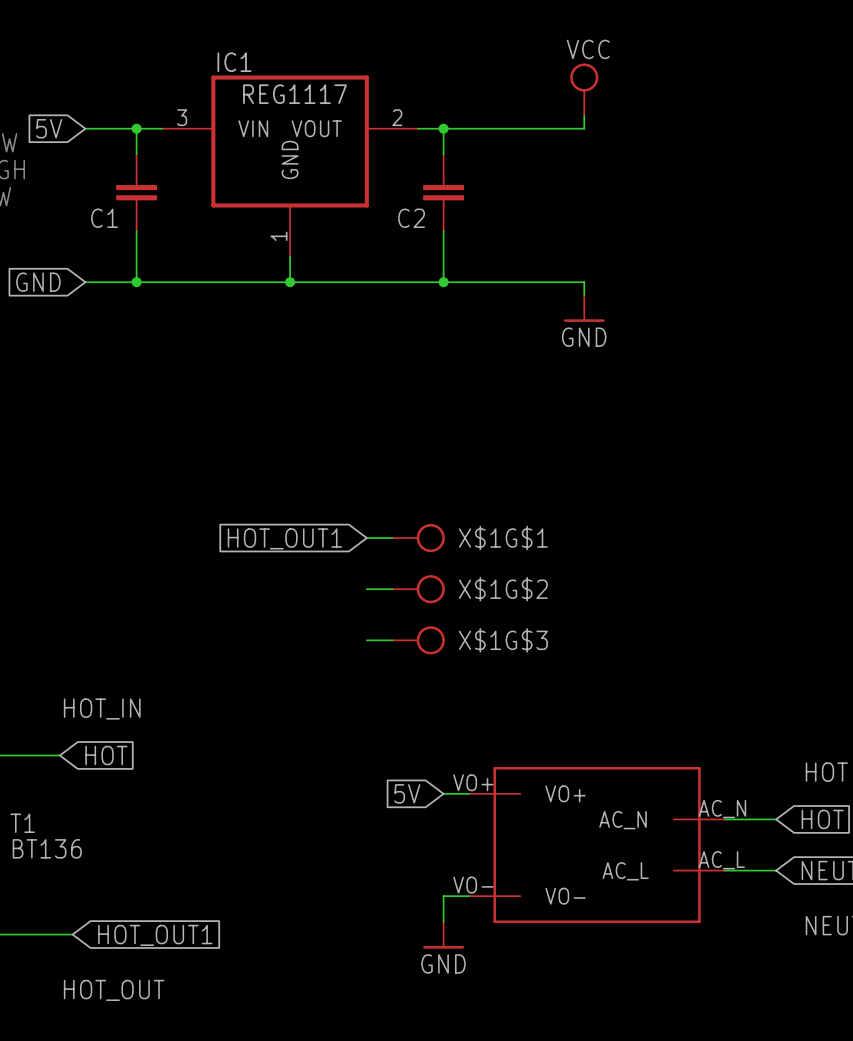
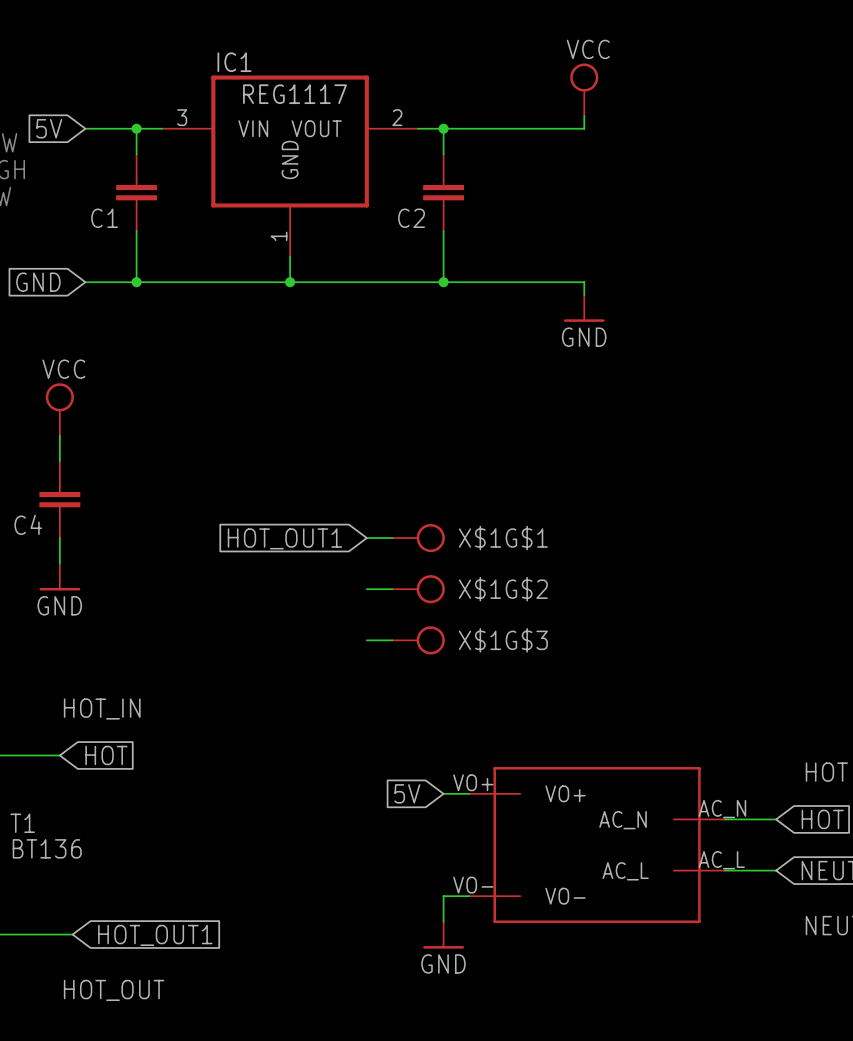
power symbol: none -> VCC (59, 409)
wire: none -> (59, 435) (59, 461)
C4: none -> (59, 499)
wire: none -> (59, 538) (59, 563)
power symbol: none -> GND (59, 577)

